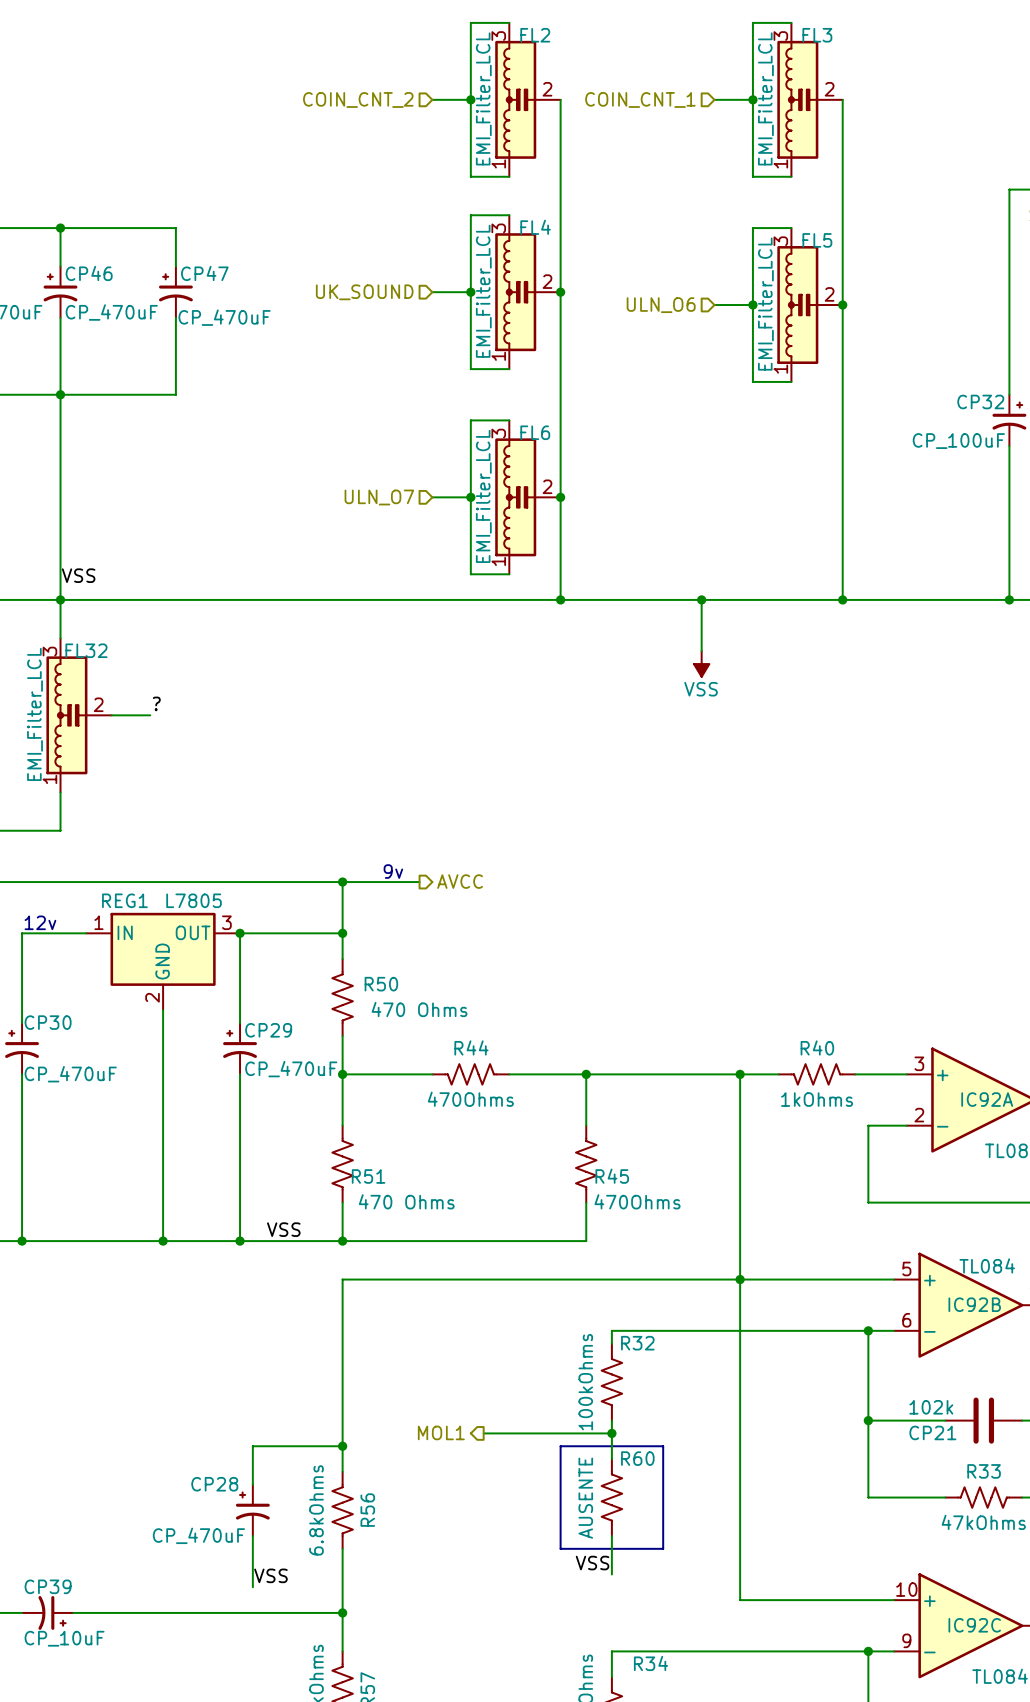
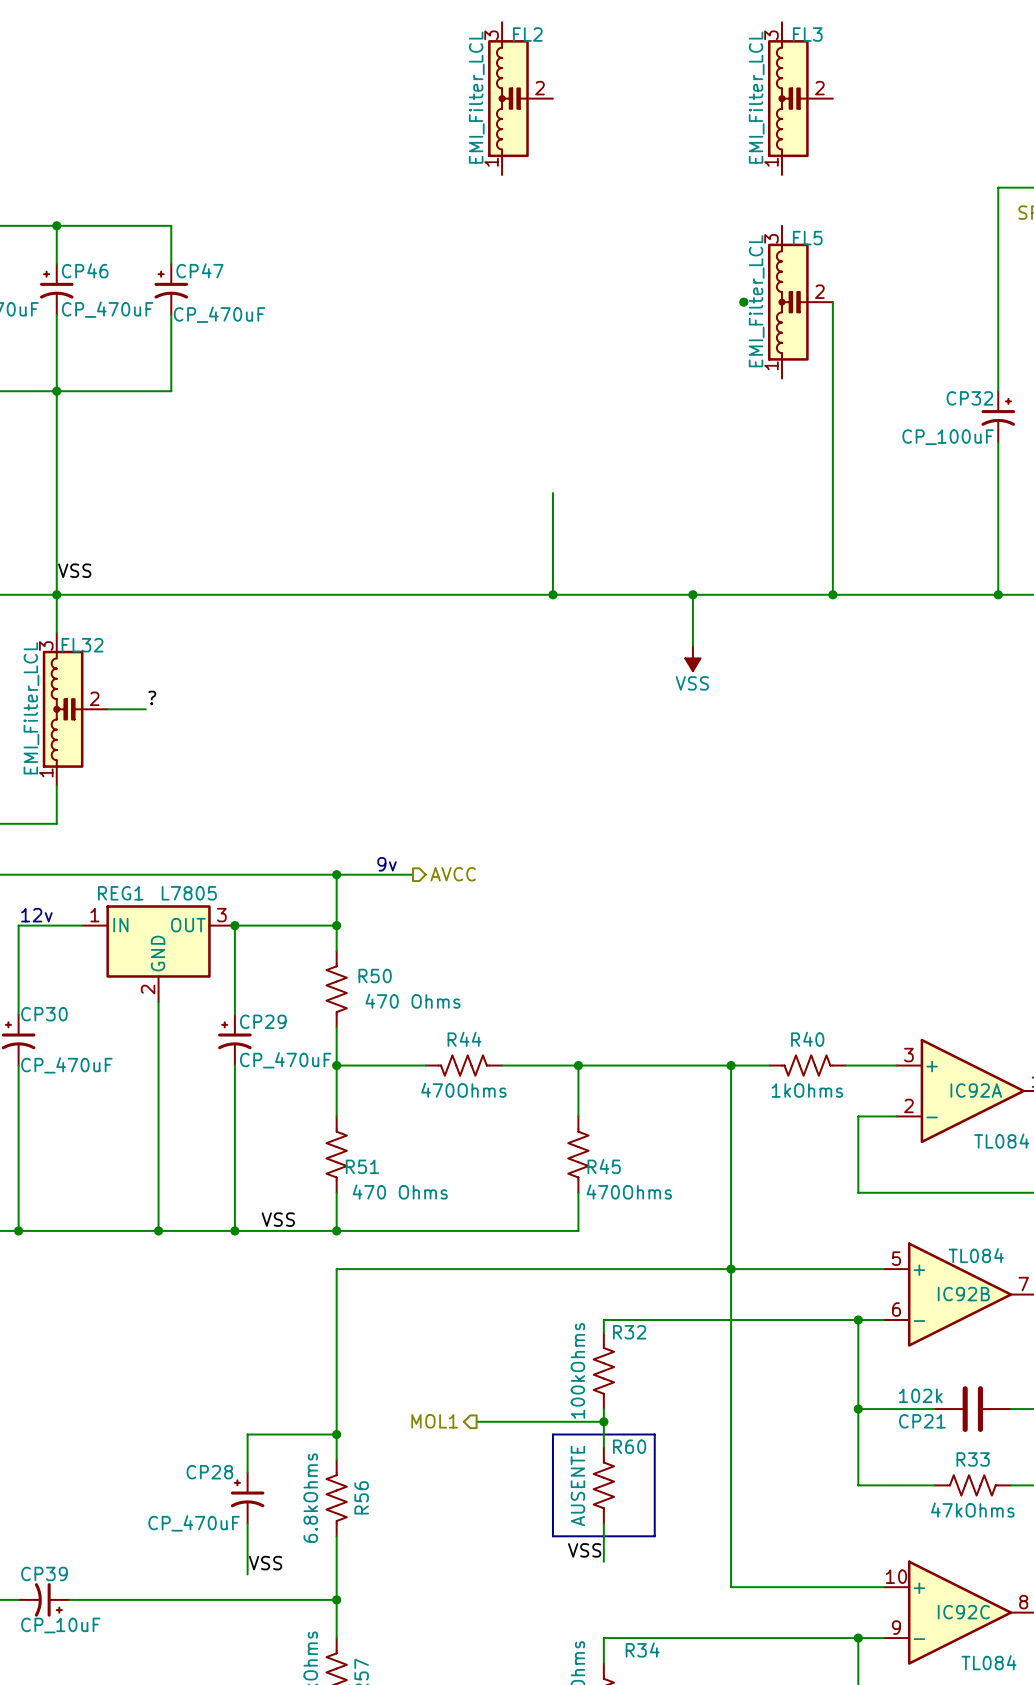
wire: (509, 22) (470, 22) (470, 176) (509, 176) -> none
wire: (791, 22) (752, 22) (752, 176) (791, 176) -> none
hierarchical label: COIN_CNT_2 (358, 99) -> none
wire: (432, 99) (470, 99) -> none
junction: (470, 99) -> none
wire: (560, 99) (560, 497) -> none
hierarchical label: COIN_CNT_1 (640, 99) -> none
wire: (714, 99) (752, 99) -> none
junction: (752, 99) -> none
wire: (842, 99) (842, 305) -> none
wire: (509, 215) (470, 215) (470, 369) (509, 369) -> none
wire: (791, 228) (752, 228) (752, 381) (791, 381) -> none
hierarchical label: UK_SOUND (364, 292) -> none
wire: (432, 292) (470, 292) -> none
junction: (470, 292) -> none
FL4: EMI_Filter_LCL (527, 292) -> none
junction: (560, 292) -> none
hierarchical label: ULN_O6 (661, 305) -> none
wire: (714, 305) (752, 305) -> none
junction: (842, 305) -> none
wire: (509, 420) (470, 420) (470, 574) (509, 574) -> none
hierarchical label: ULN_O7 (379, 497) -> none
wire: (432, 497) (470, 497) -> none
junction: (470, 497) -> none
FL6: EMI_Filter_LCL (527, 497) -> none
junction: (560, 497) -> none

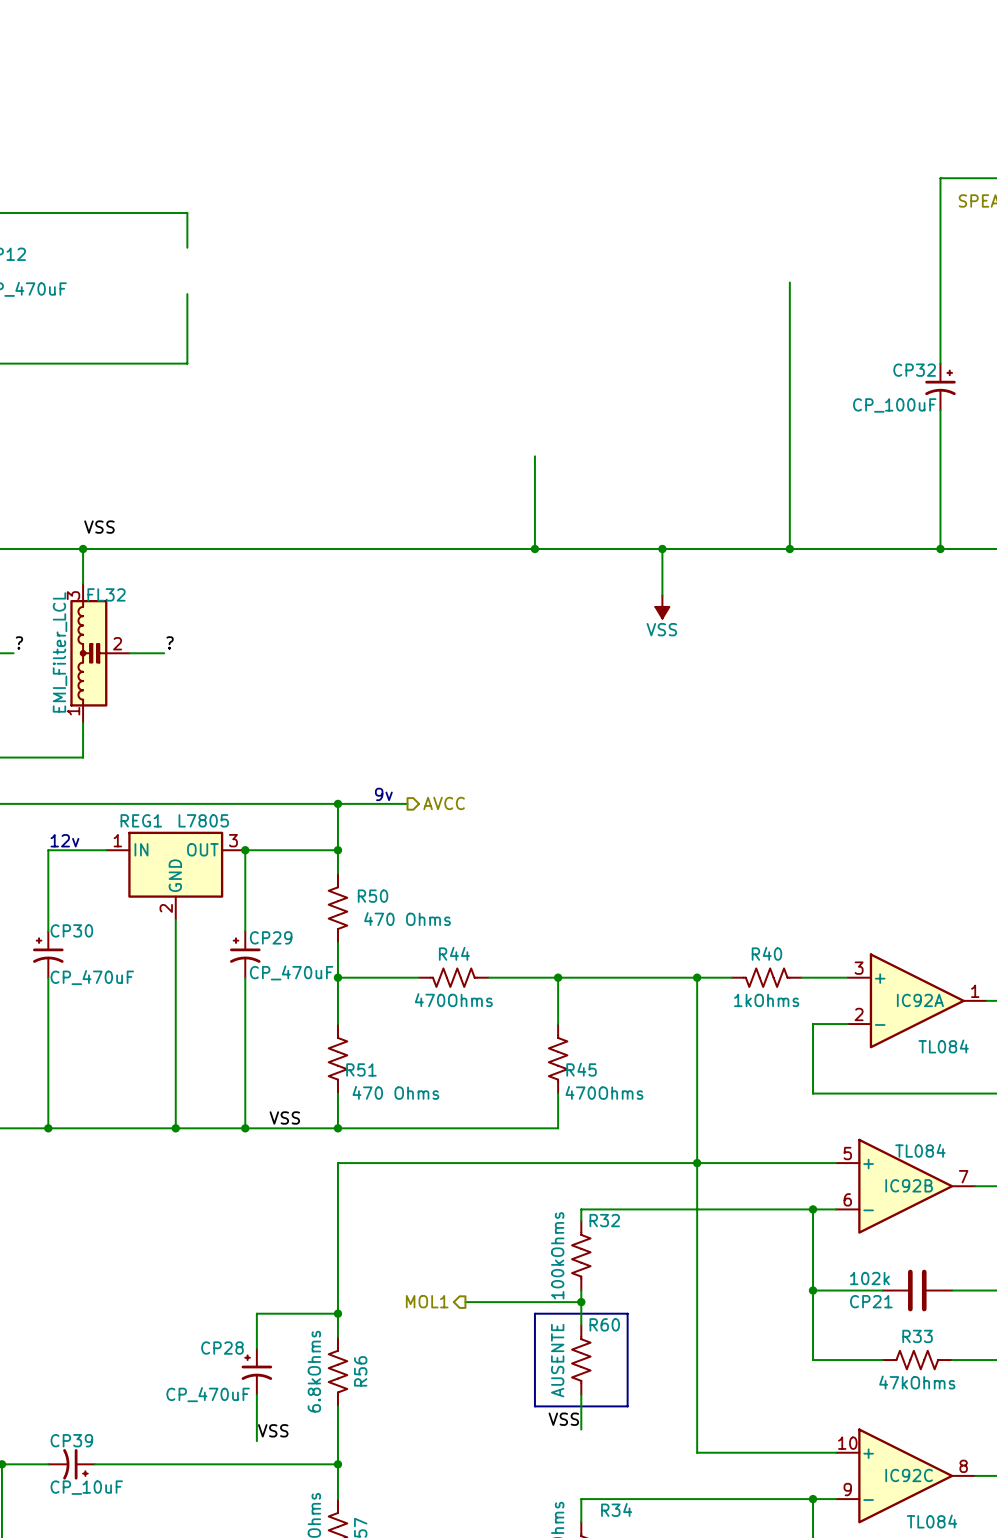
FL2: EMI_Filter_LCL (520, 98) -> none
FL3: EMI_Filter_LCL (800, 98) -> none
wire: (56, 225) (56, 264) -> none
junction: (56, 225) -> none
CP46: CP_470uF (56, 289) -> none
CP47: CP_470uF (171, 289) -> none
junction: (743, 302) -> none
FL5: EMI_Filter_LCL (800, 302) -> none
wire: (56, 314) (56, 594) -> none
junction: (56, 391) -> none

